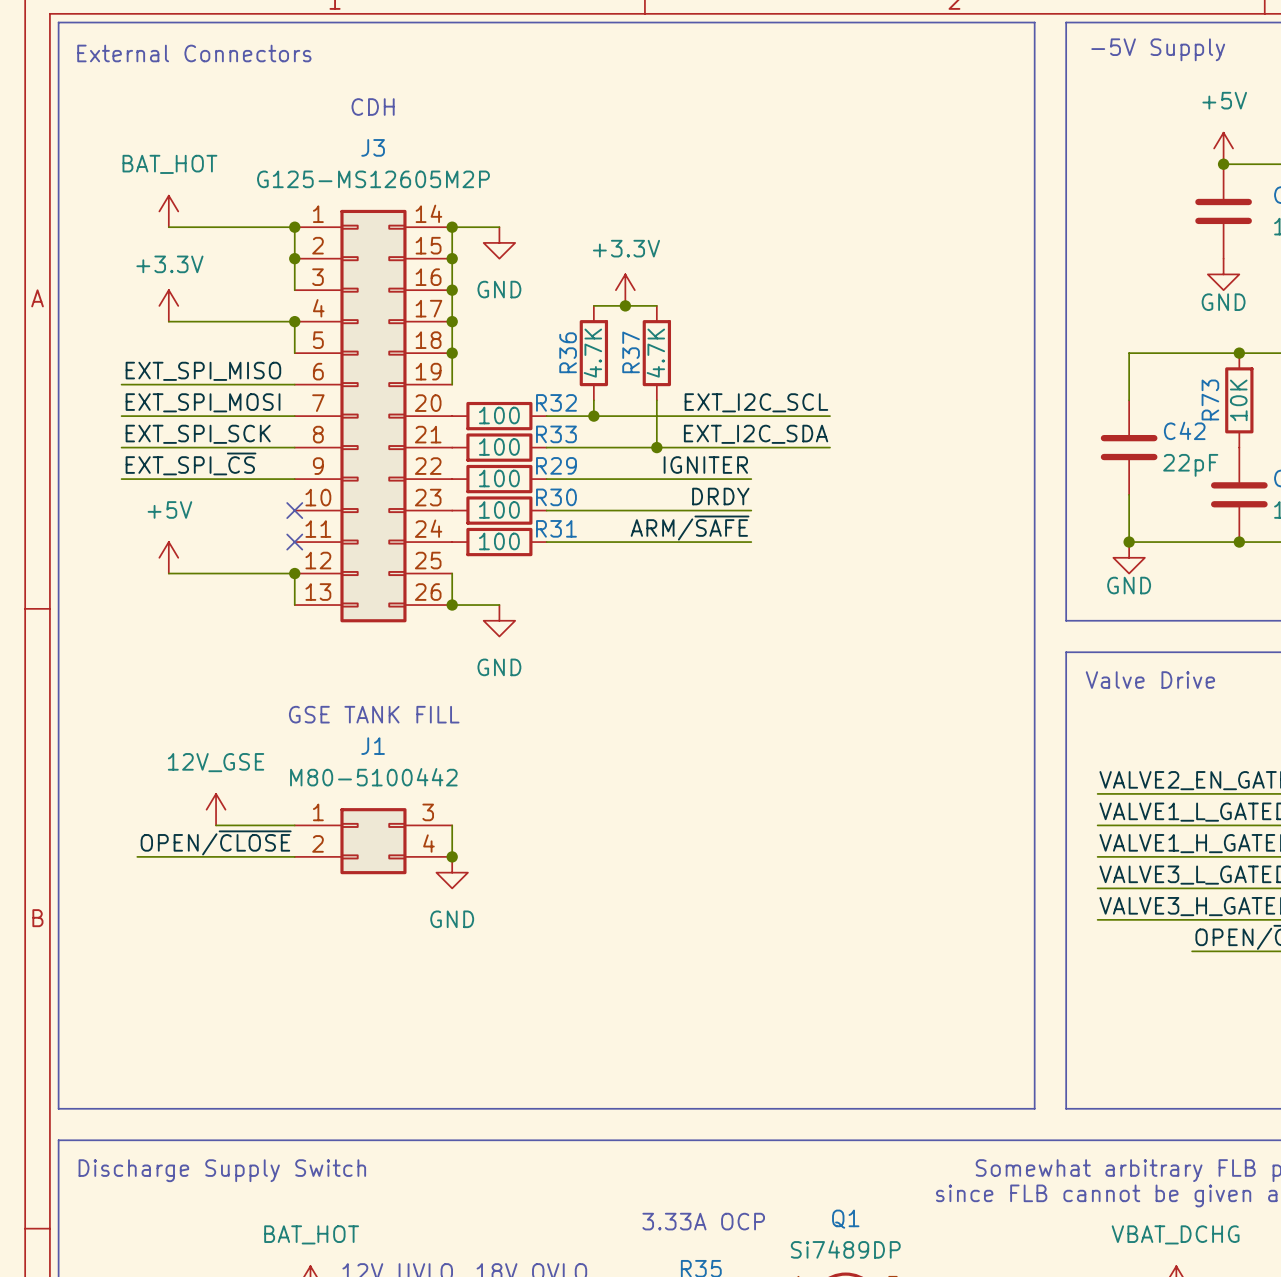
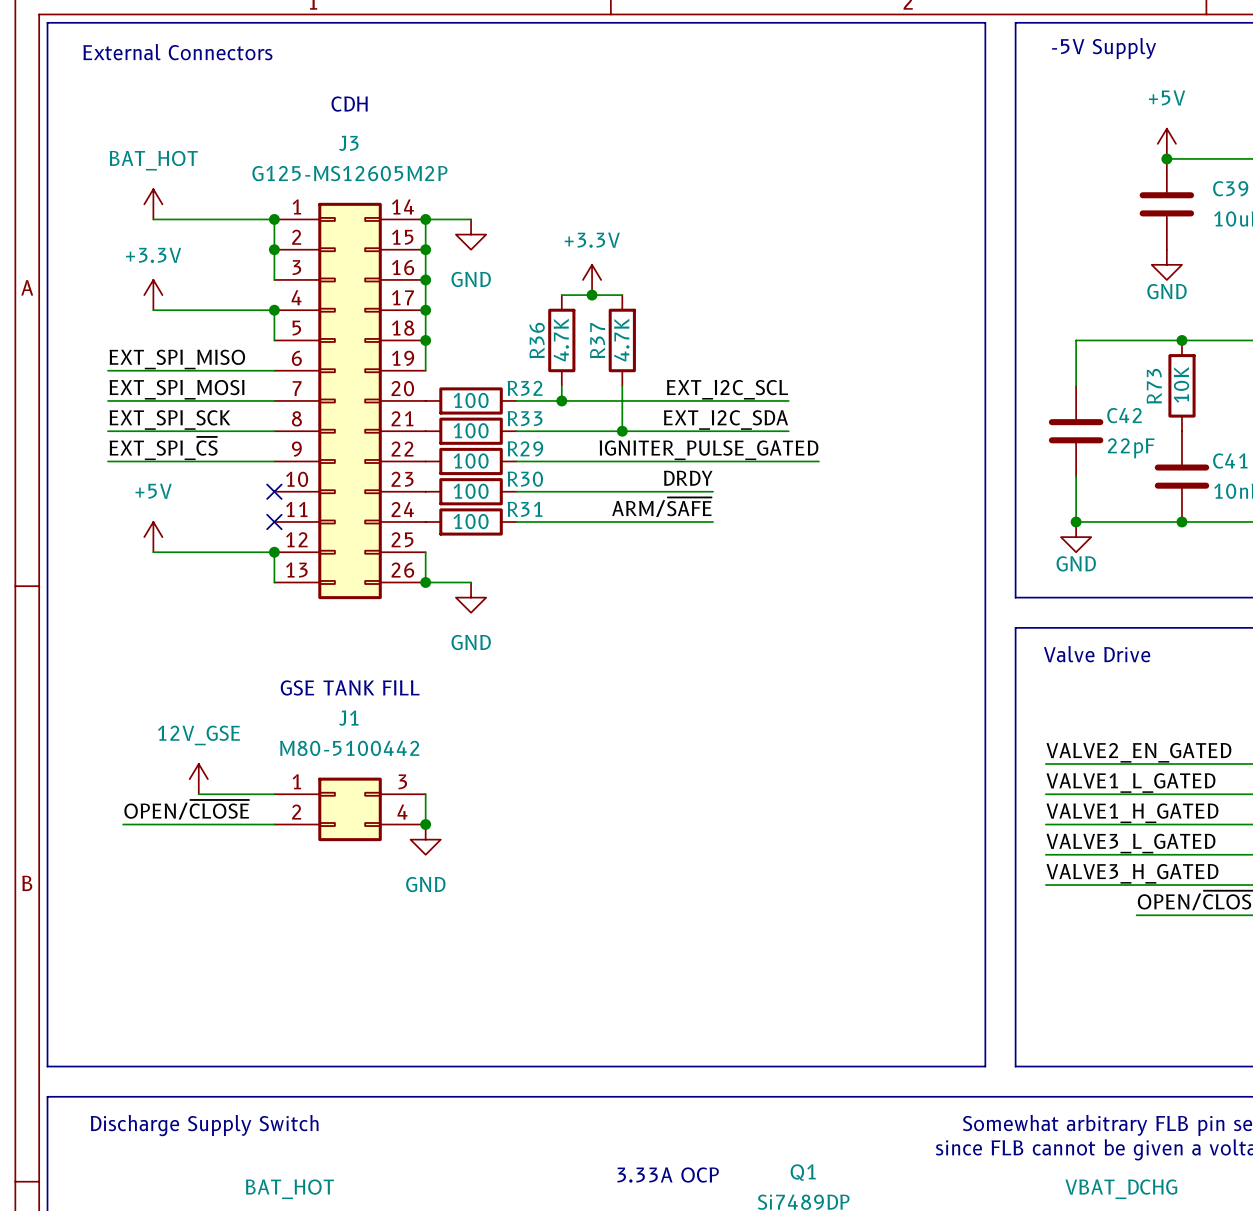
label: IGNITER (705, 465) -> none
label: none -> IGNITER_PULSE_GATED (708, 450)
wire: none -> (713, 461) (818, 461)

